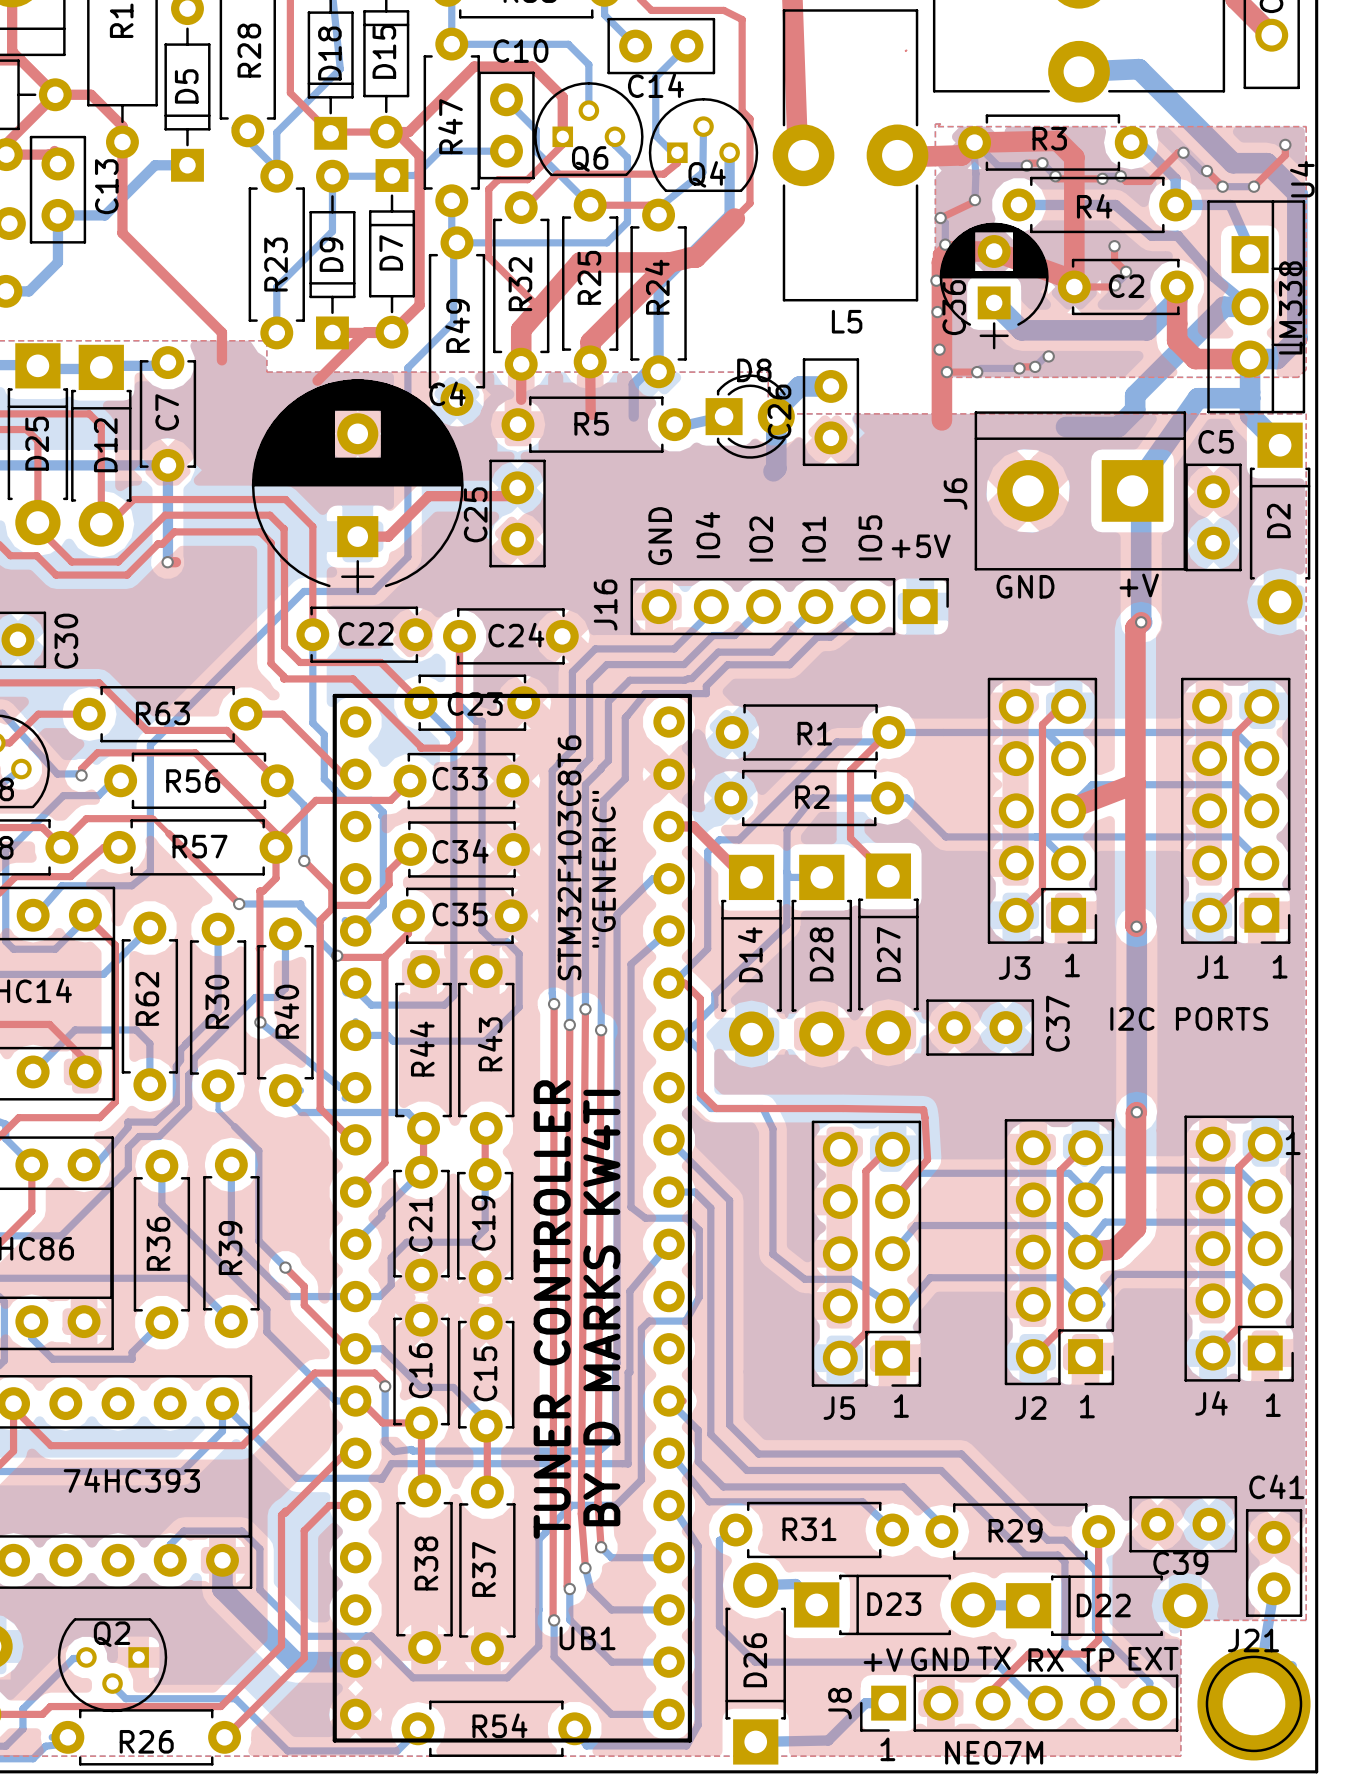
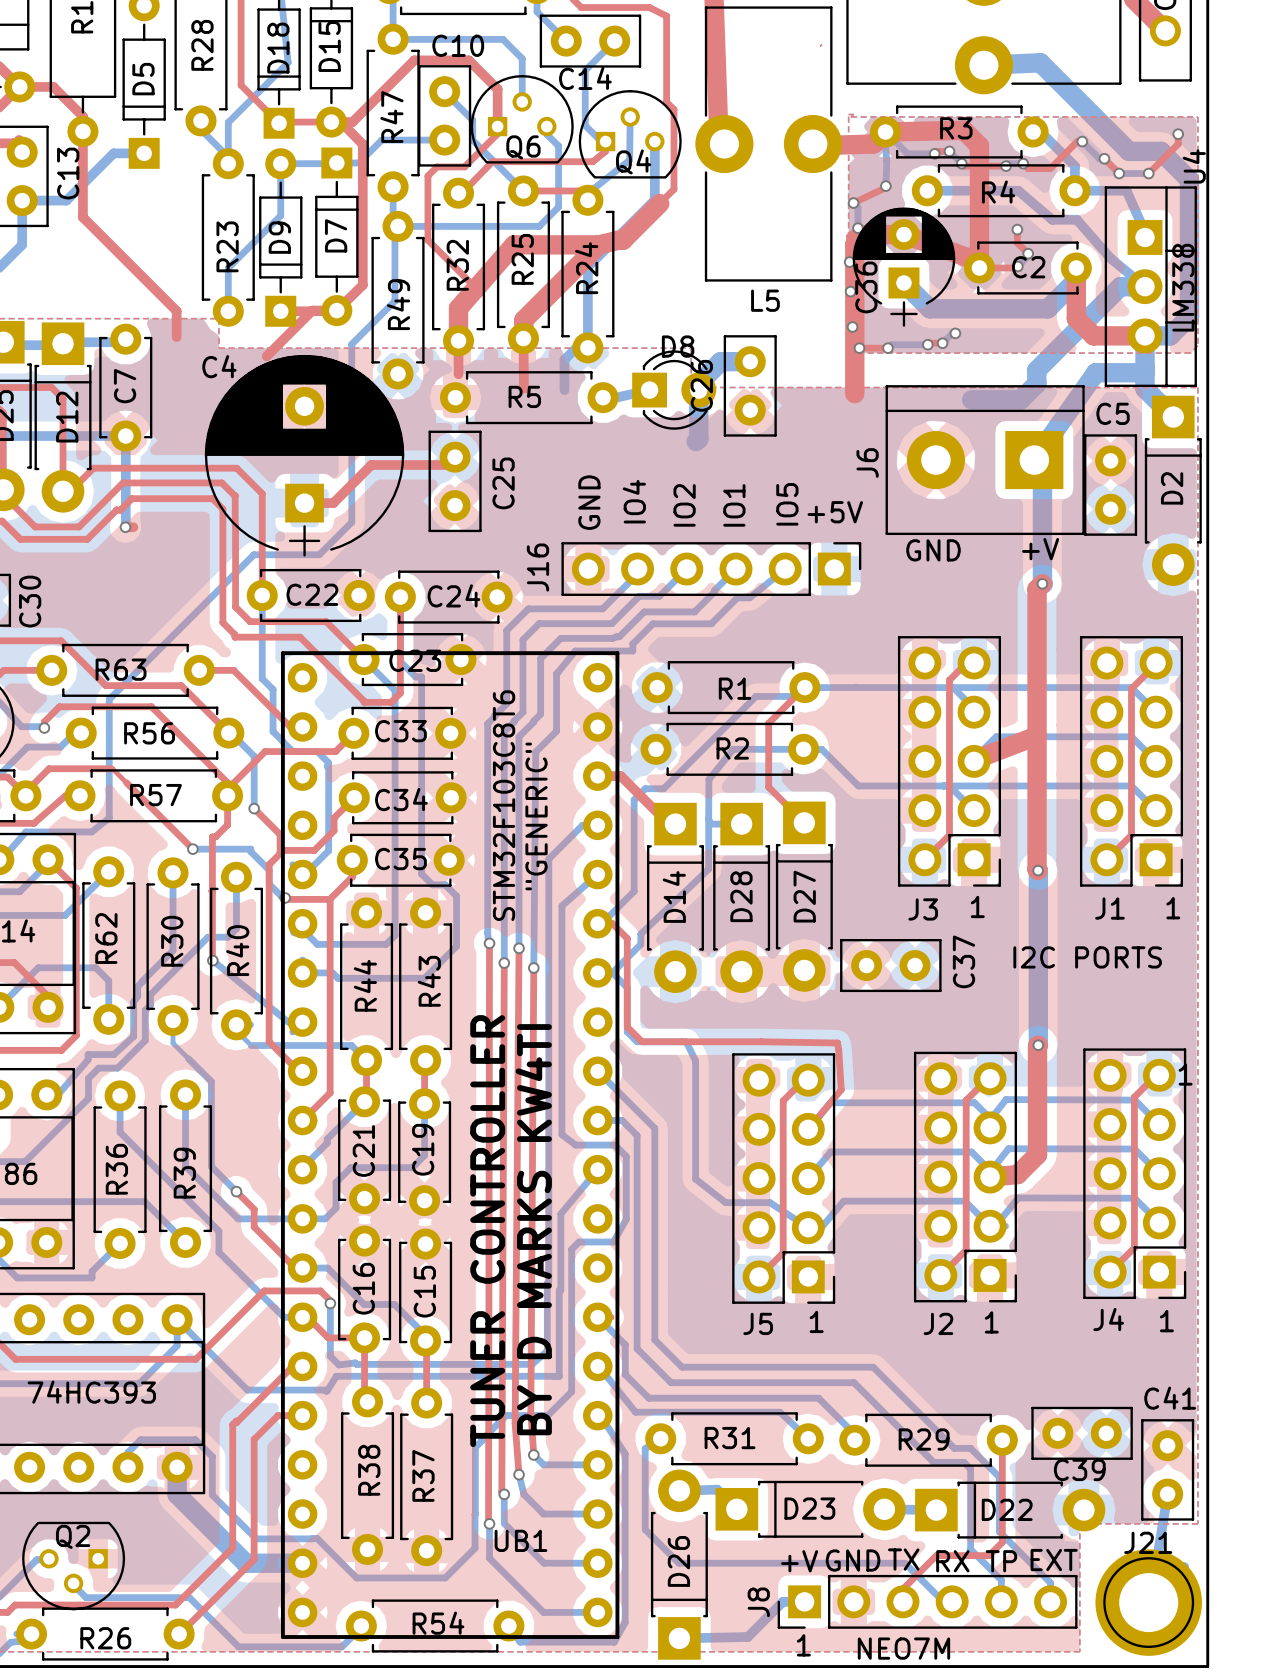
C4 name position: C4 (447, 393) -> C4 (219, 366)
C25 name position: C25 (475, 514) -> C25 (503, 483)

